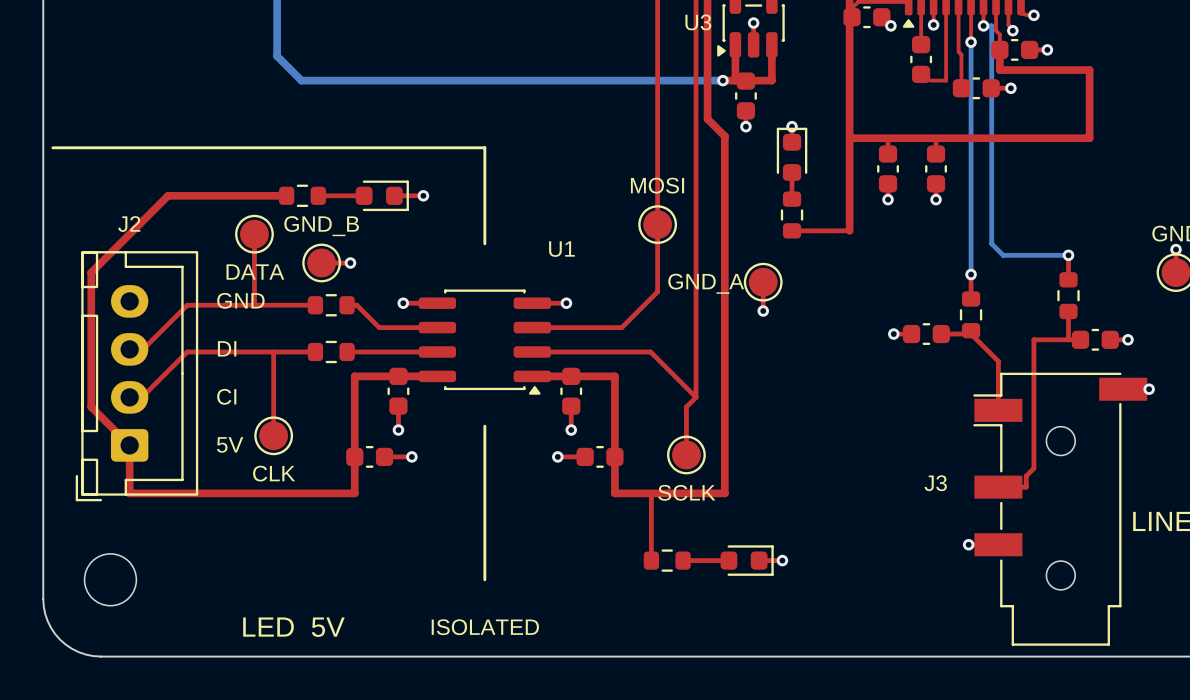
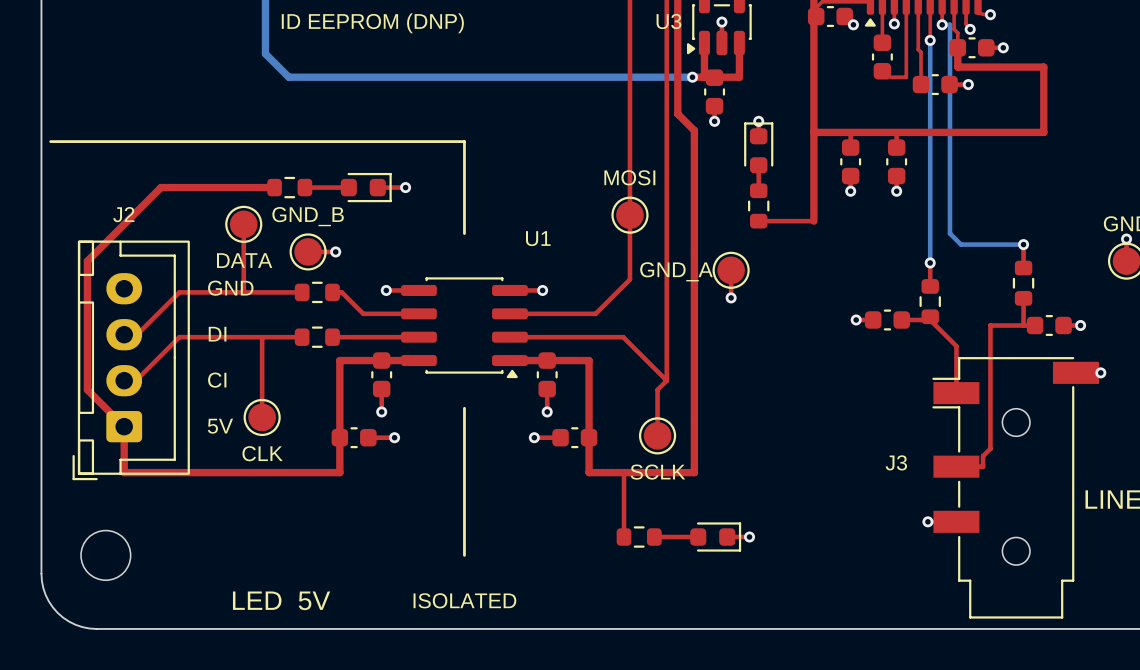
text: none -> ID EEPROM (DNP) (372, 23)

